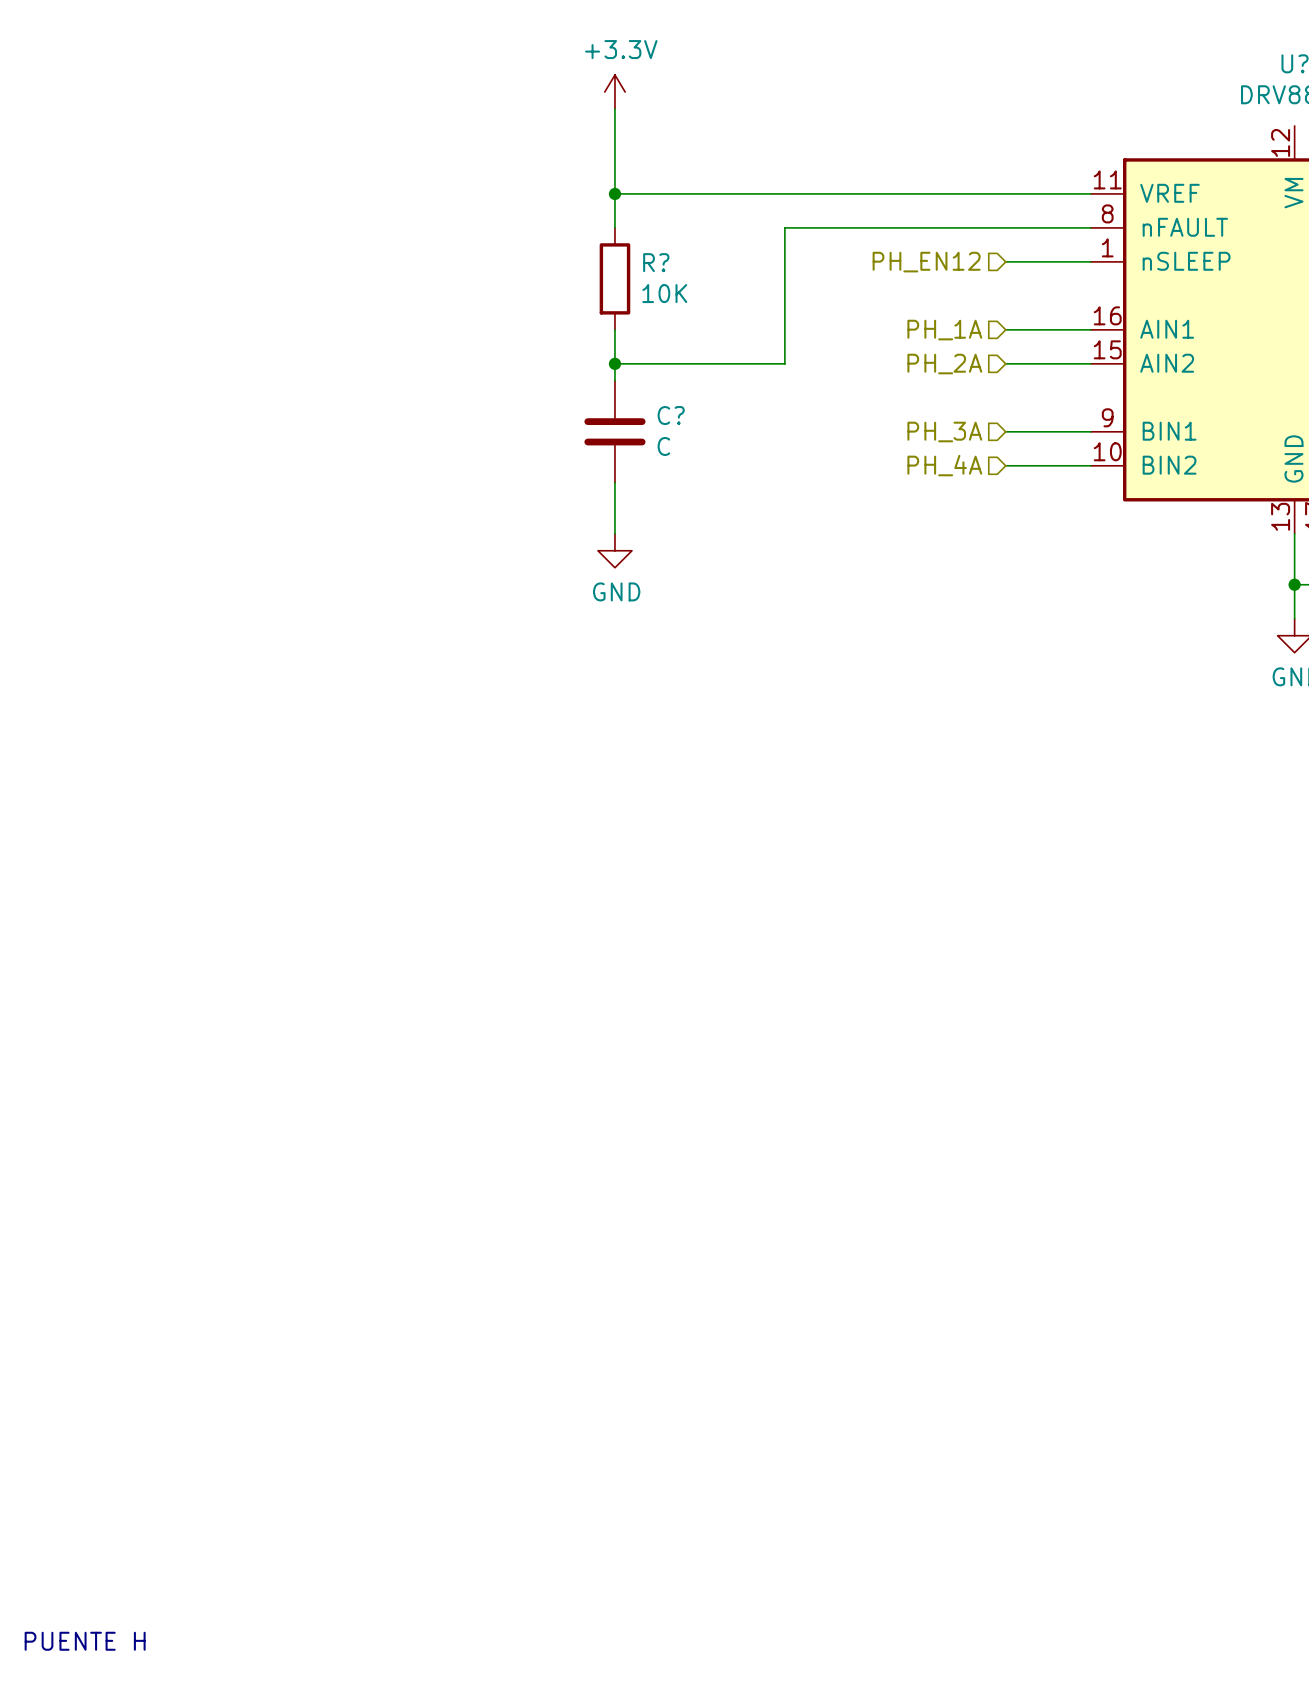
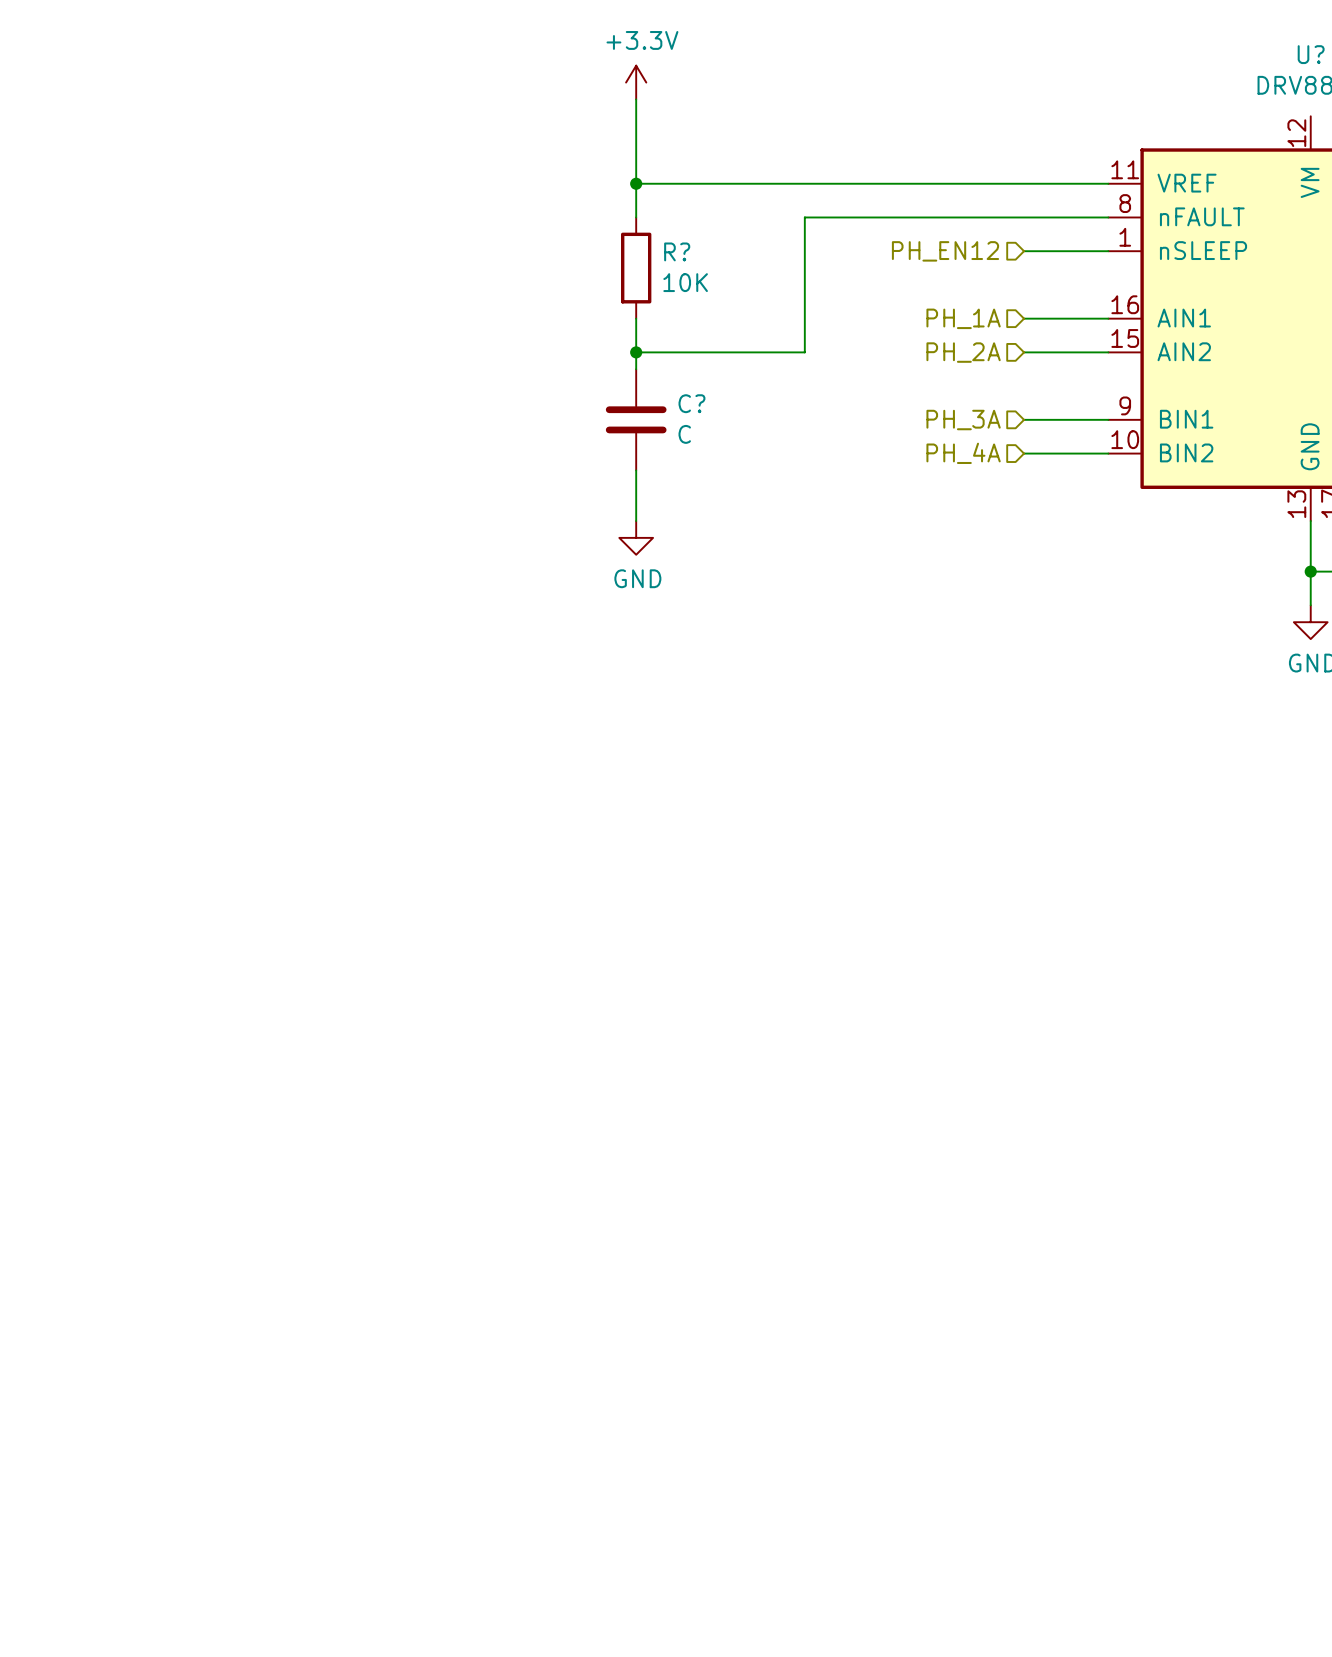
text: PUENTE H (85, 1641) -> none

